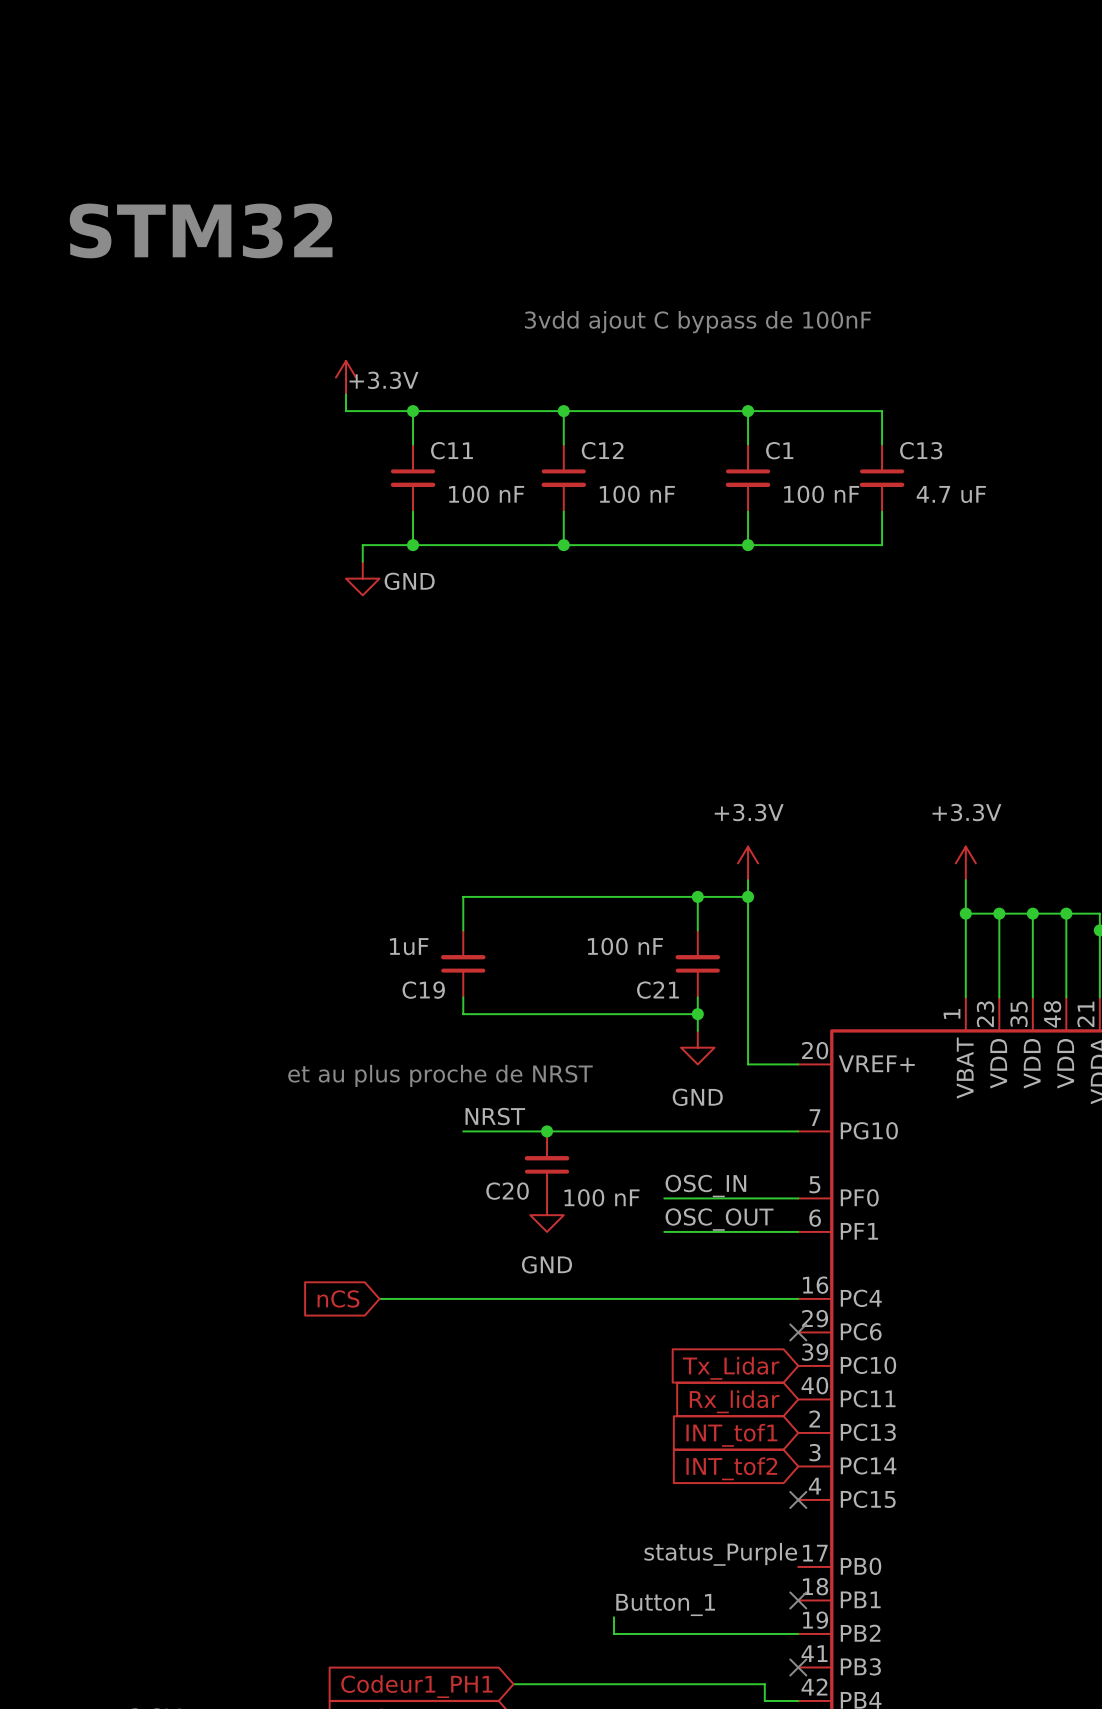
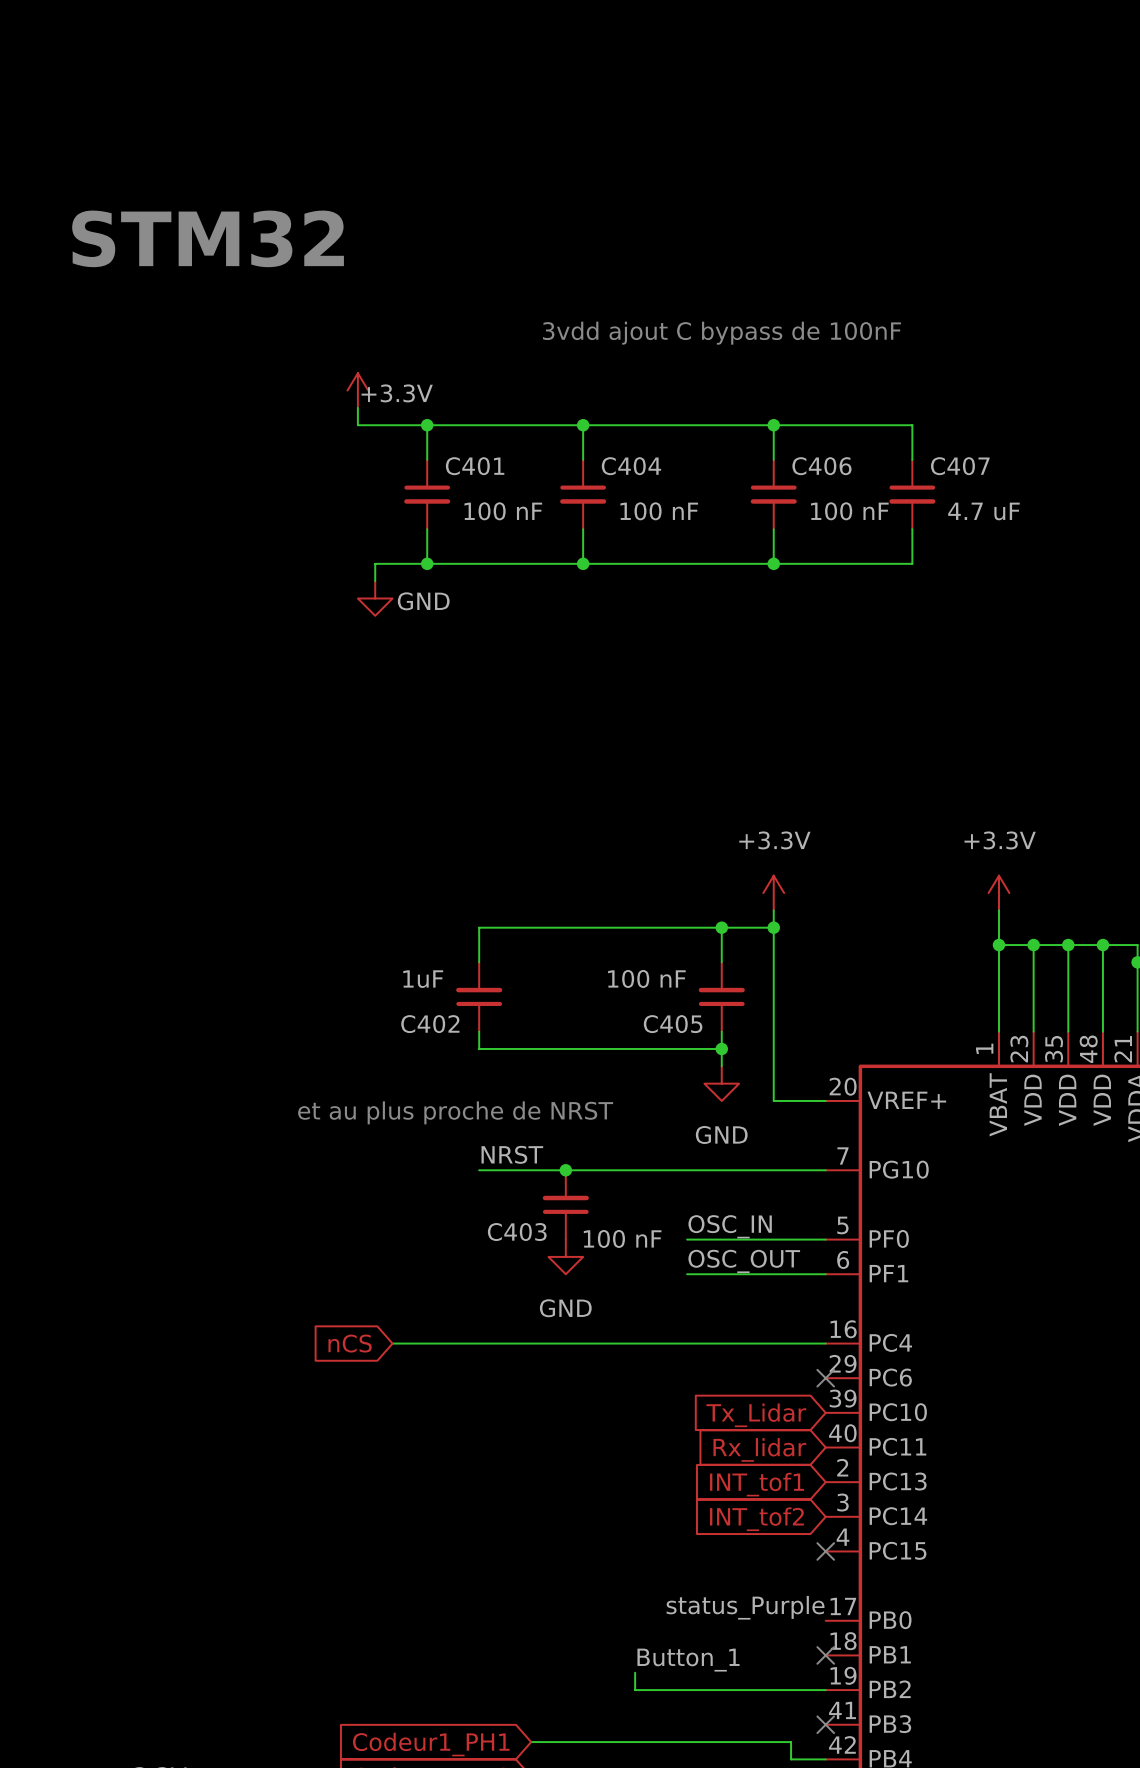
C11 name: C11 (451, 450) -> C401 (475, 466)
C12 name: C12 (602, 450) -> C404 (631, 466)
C1 name: C1 (779, 450) -> C406 (821, 466)
C13 name: C13 (921, 450) -> C407 (960, 466)
C19 name: C19 (423, 990) -> C402 (430, 1024)
C21 name: C21 (657, 990) -> C405 (673, 1024)
C20 name: C20 (507, 1191) -> C403 (517, 1232)

